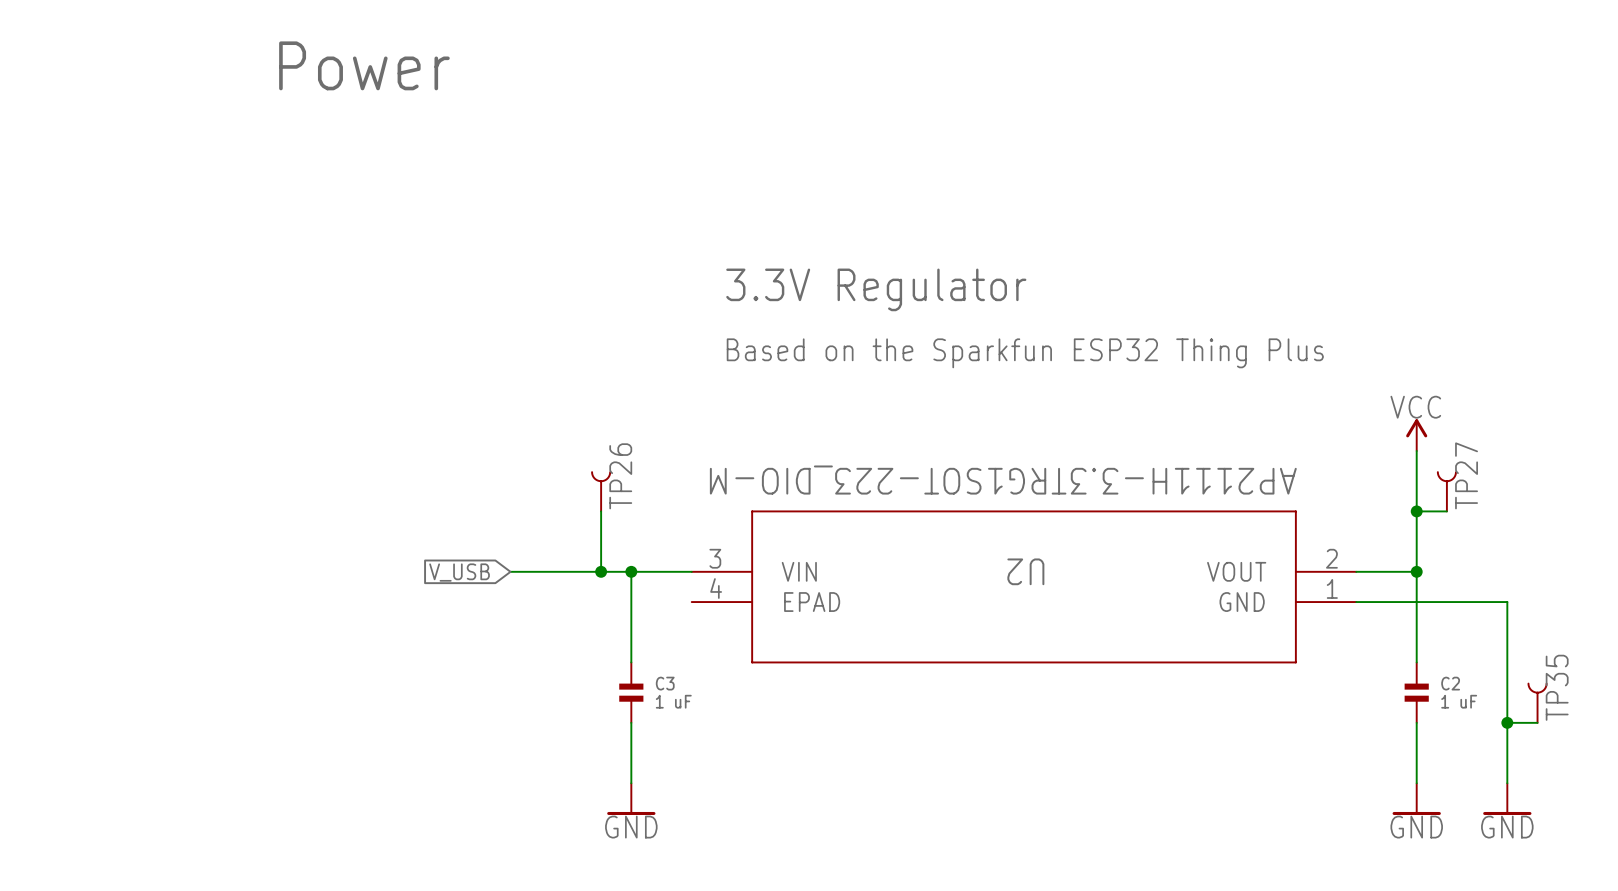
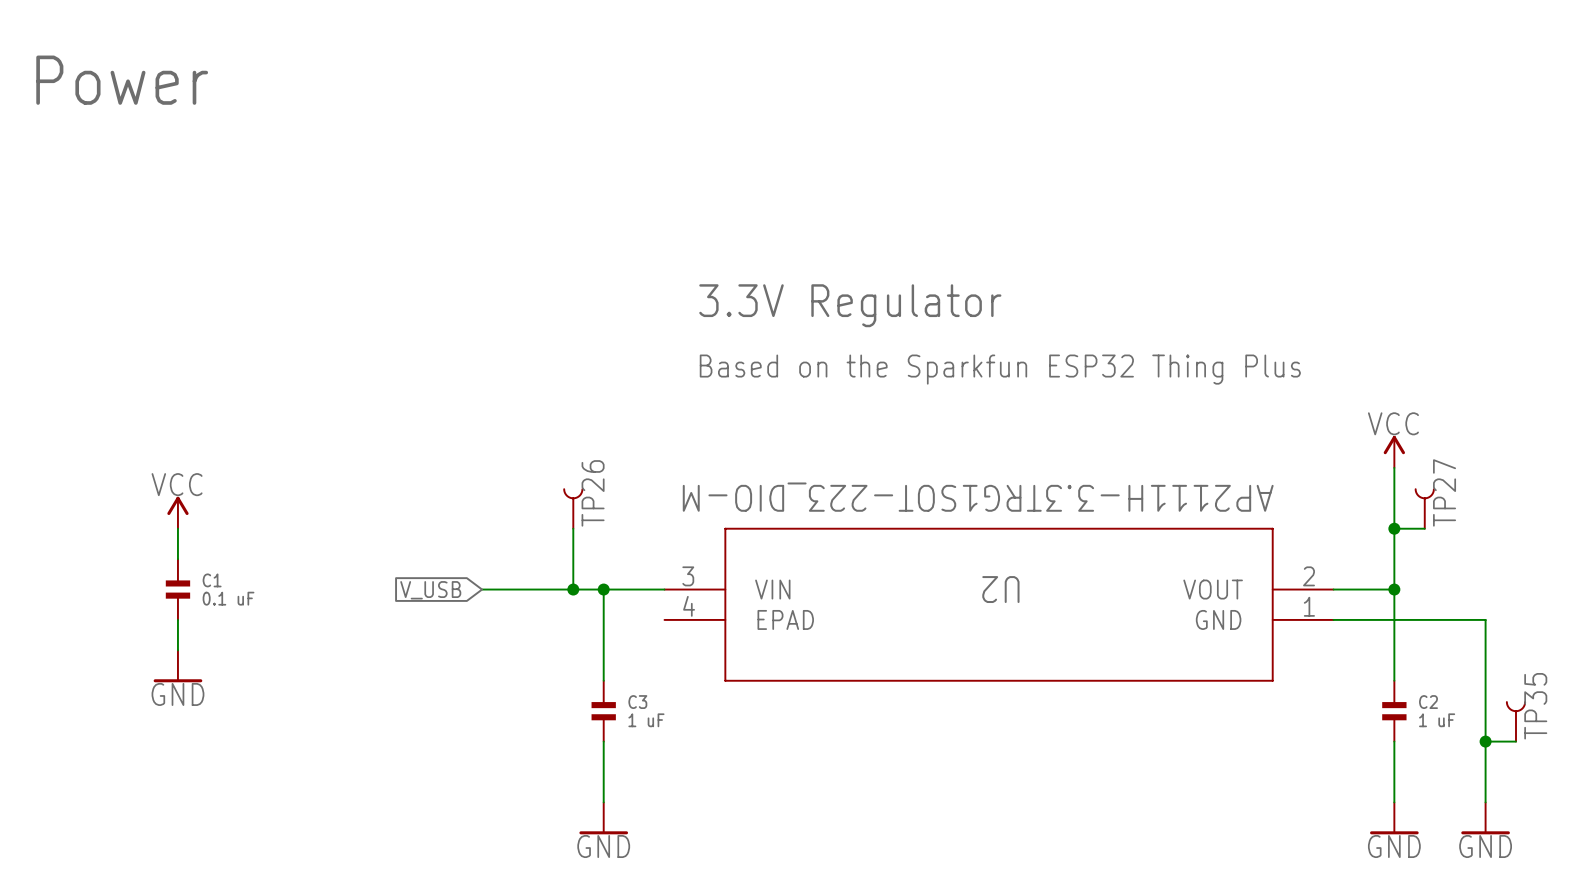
text position: Power (364, 65) -> Power (122, 80)
power symbol: none -> VCC (177, 512)
wire: none -> (177, 528) (177, 559)
C1: none -> 0.1 uF (177, 589)
wire: none -> (177, 619) (177, 650)
power symbol: none -> GND (177, 666)

